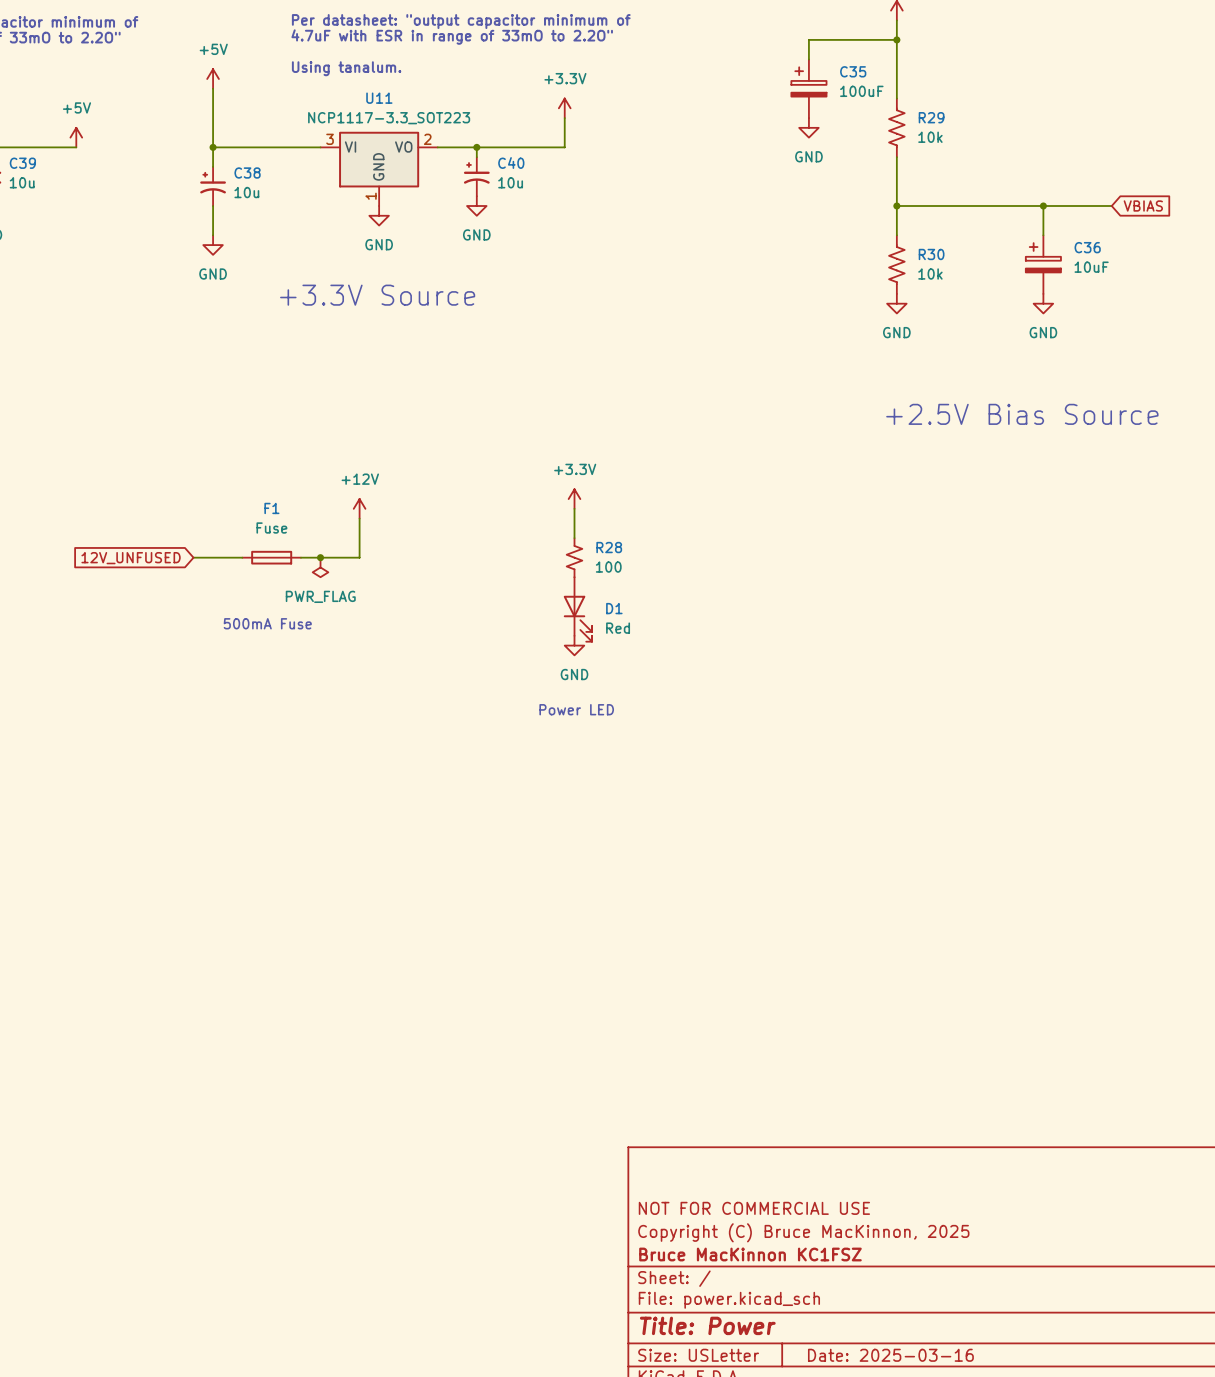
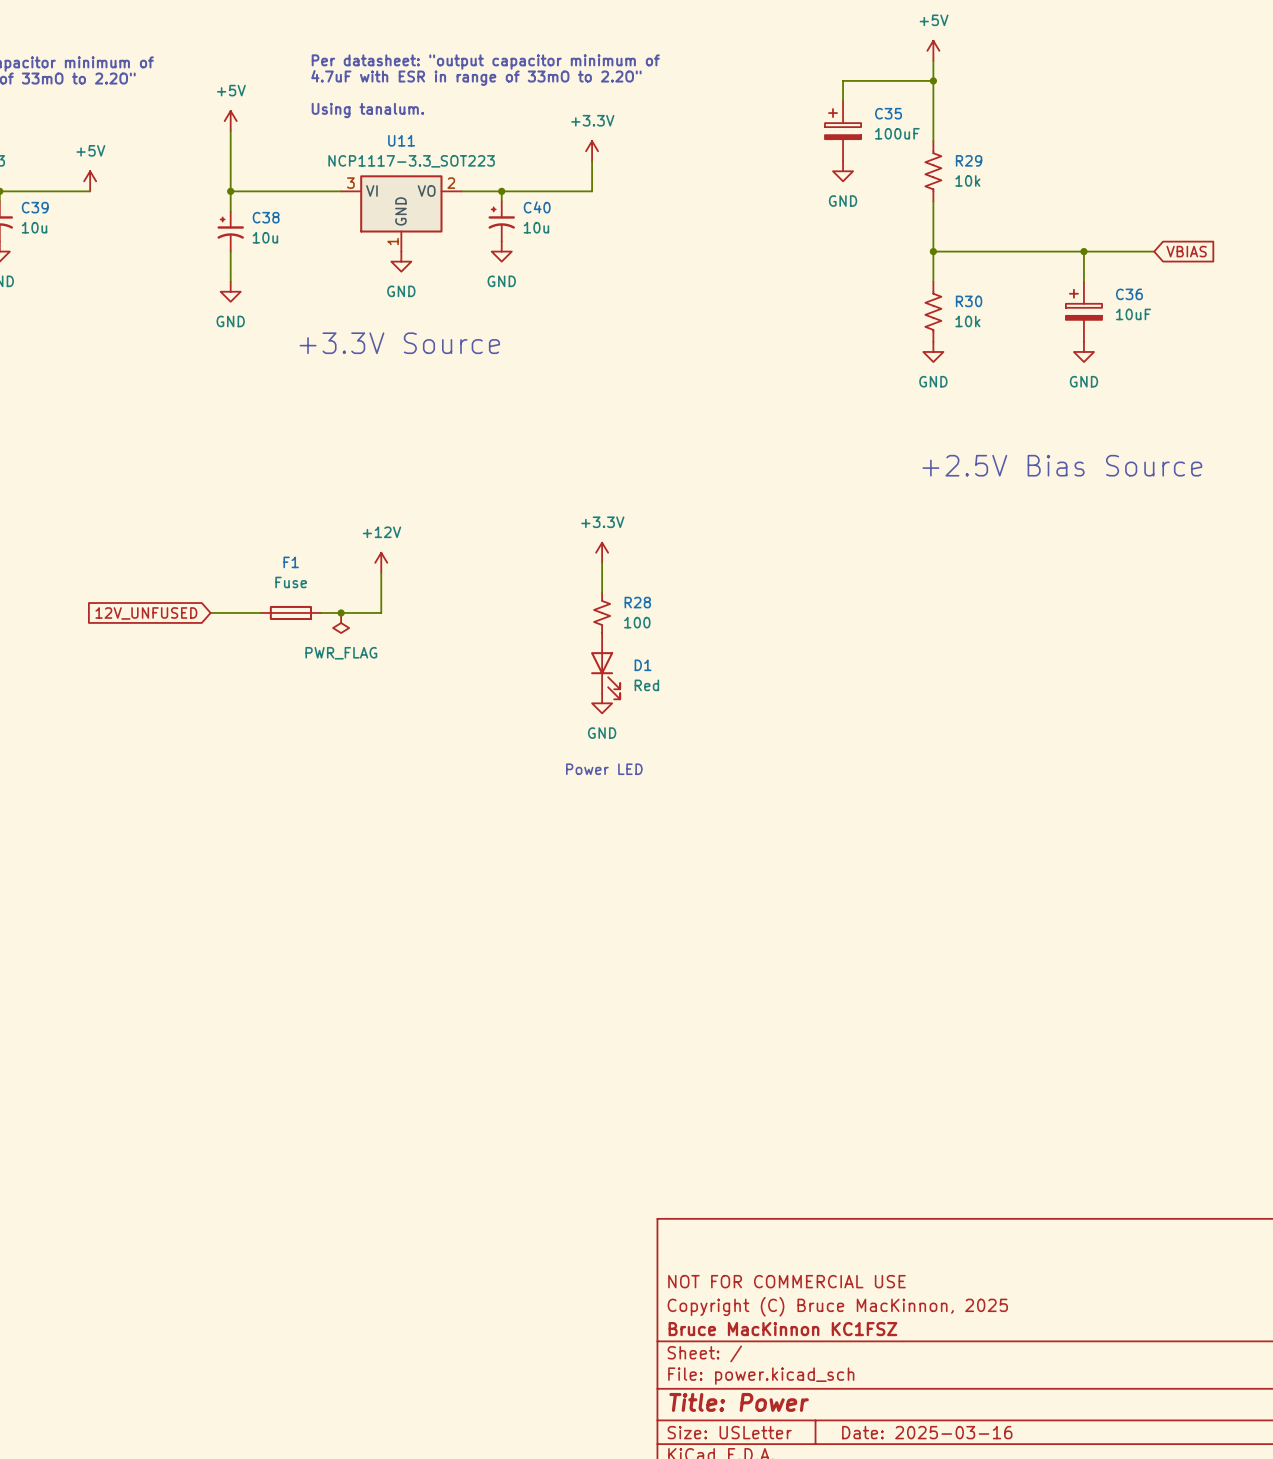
text: 500mA Fuse (267, 623) -> none

